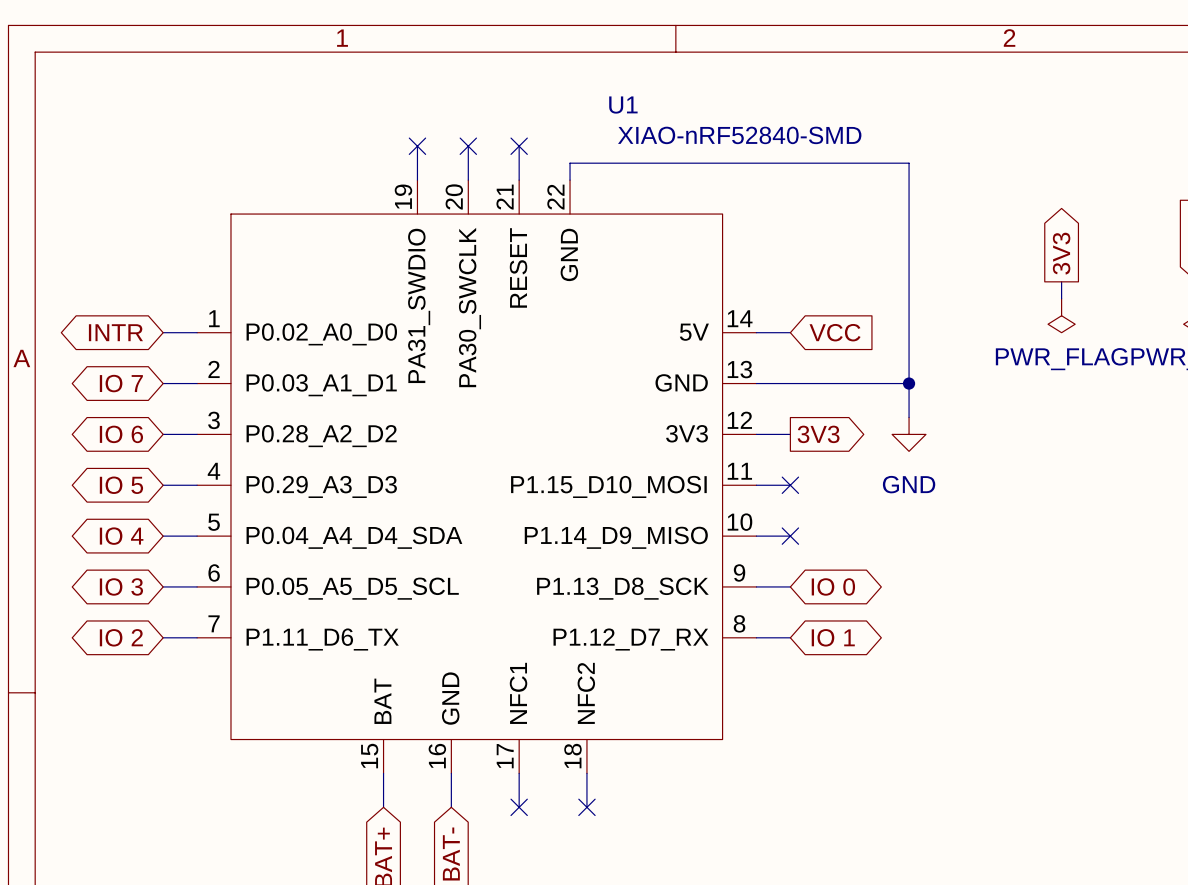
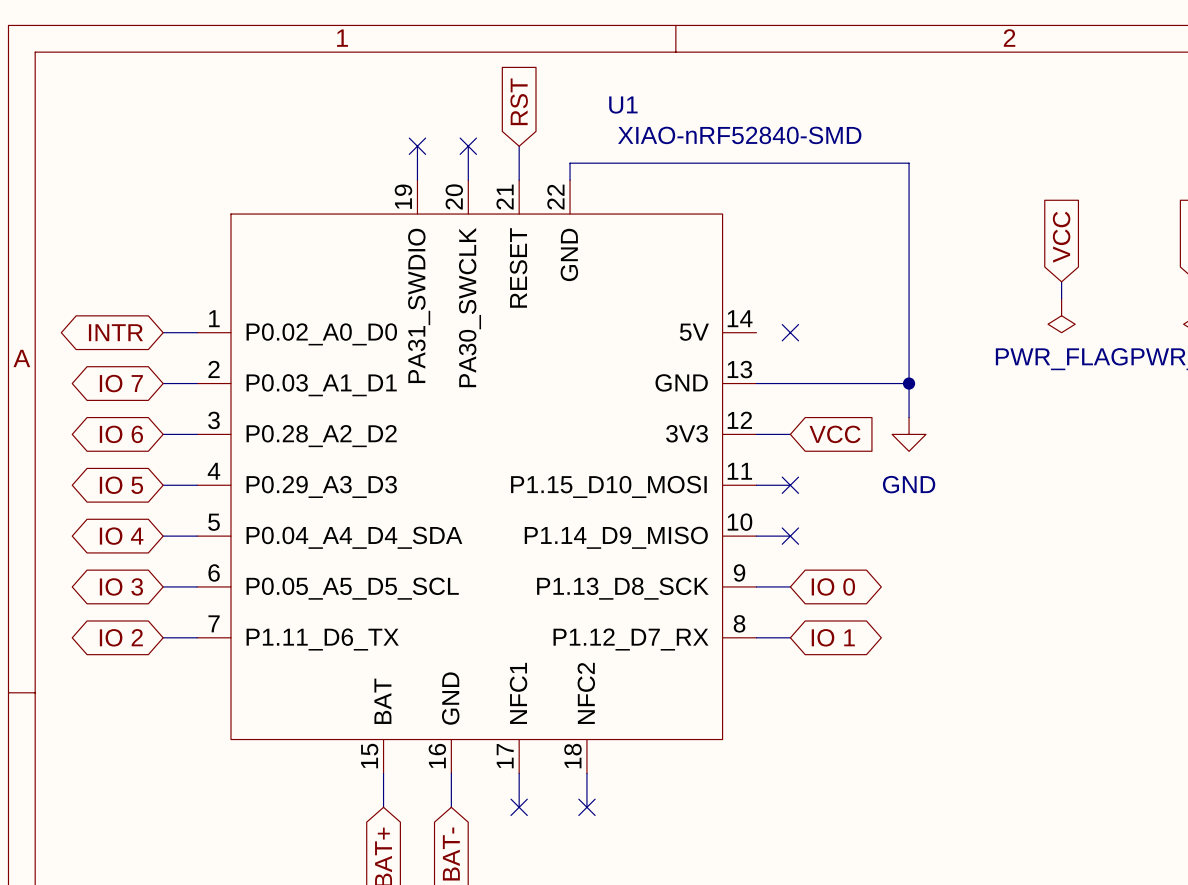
global label: none -> RST (519, 101)
no-connect mark: (519, 146) -> none
global label shape: output (1061, 253) -> input (1061, 237)
global label: 3V3 (1061, 253) -> VCC (1061, 237)
wire: (756, 332) (790, 332) -> none
no-connect mark: none -> (790, 332)
global label: VCC (835, 332) -> none
global label shape: output (818, 434) -> input (835, 434)
global label: 3V3 (818, 434) -> VCC (835, 434)

